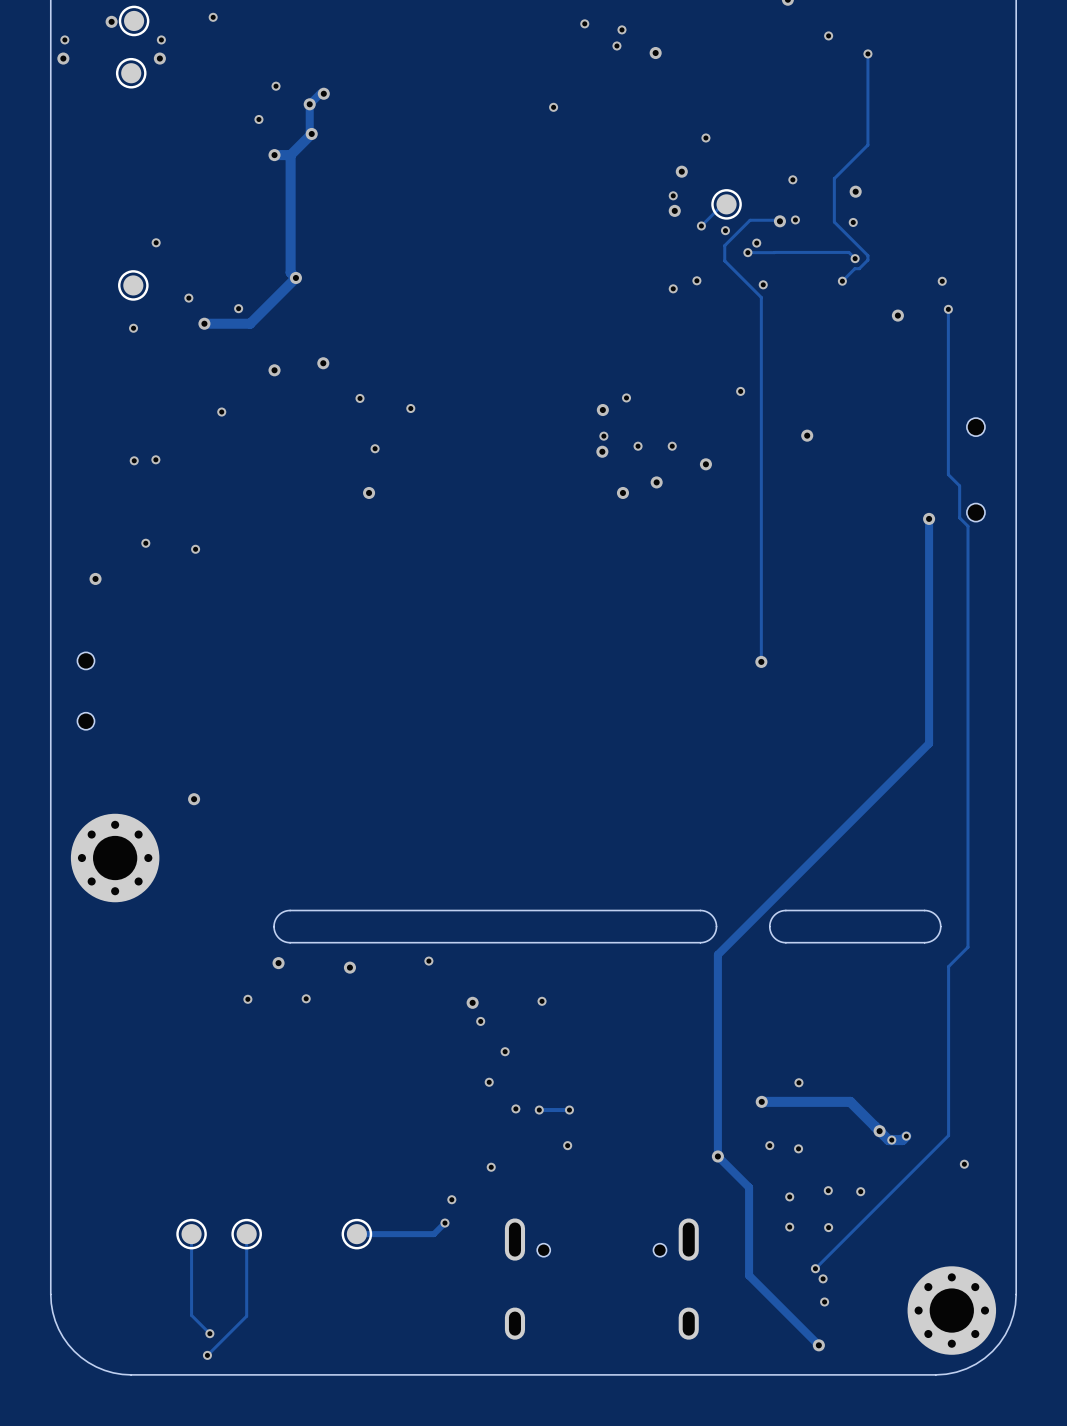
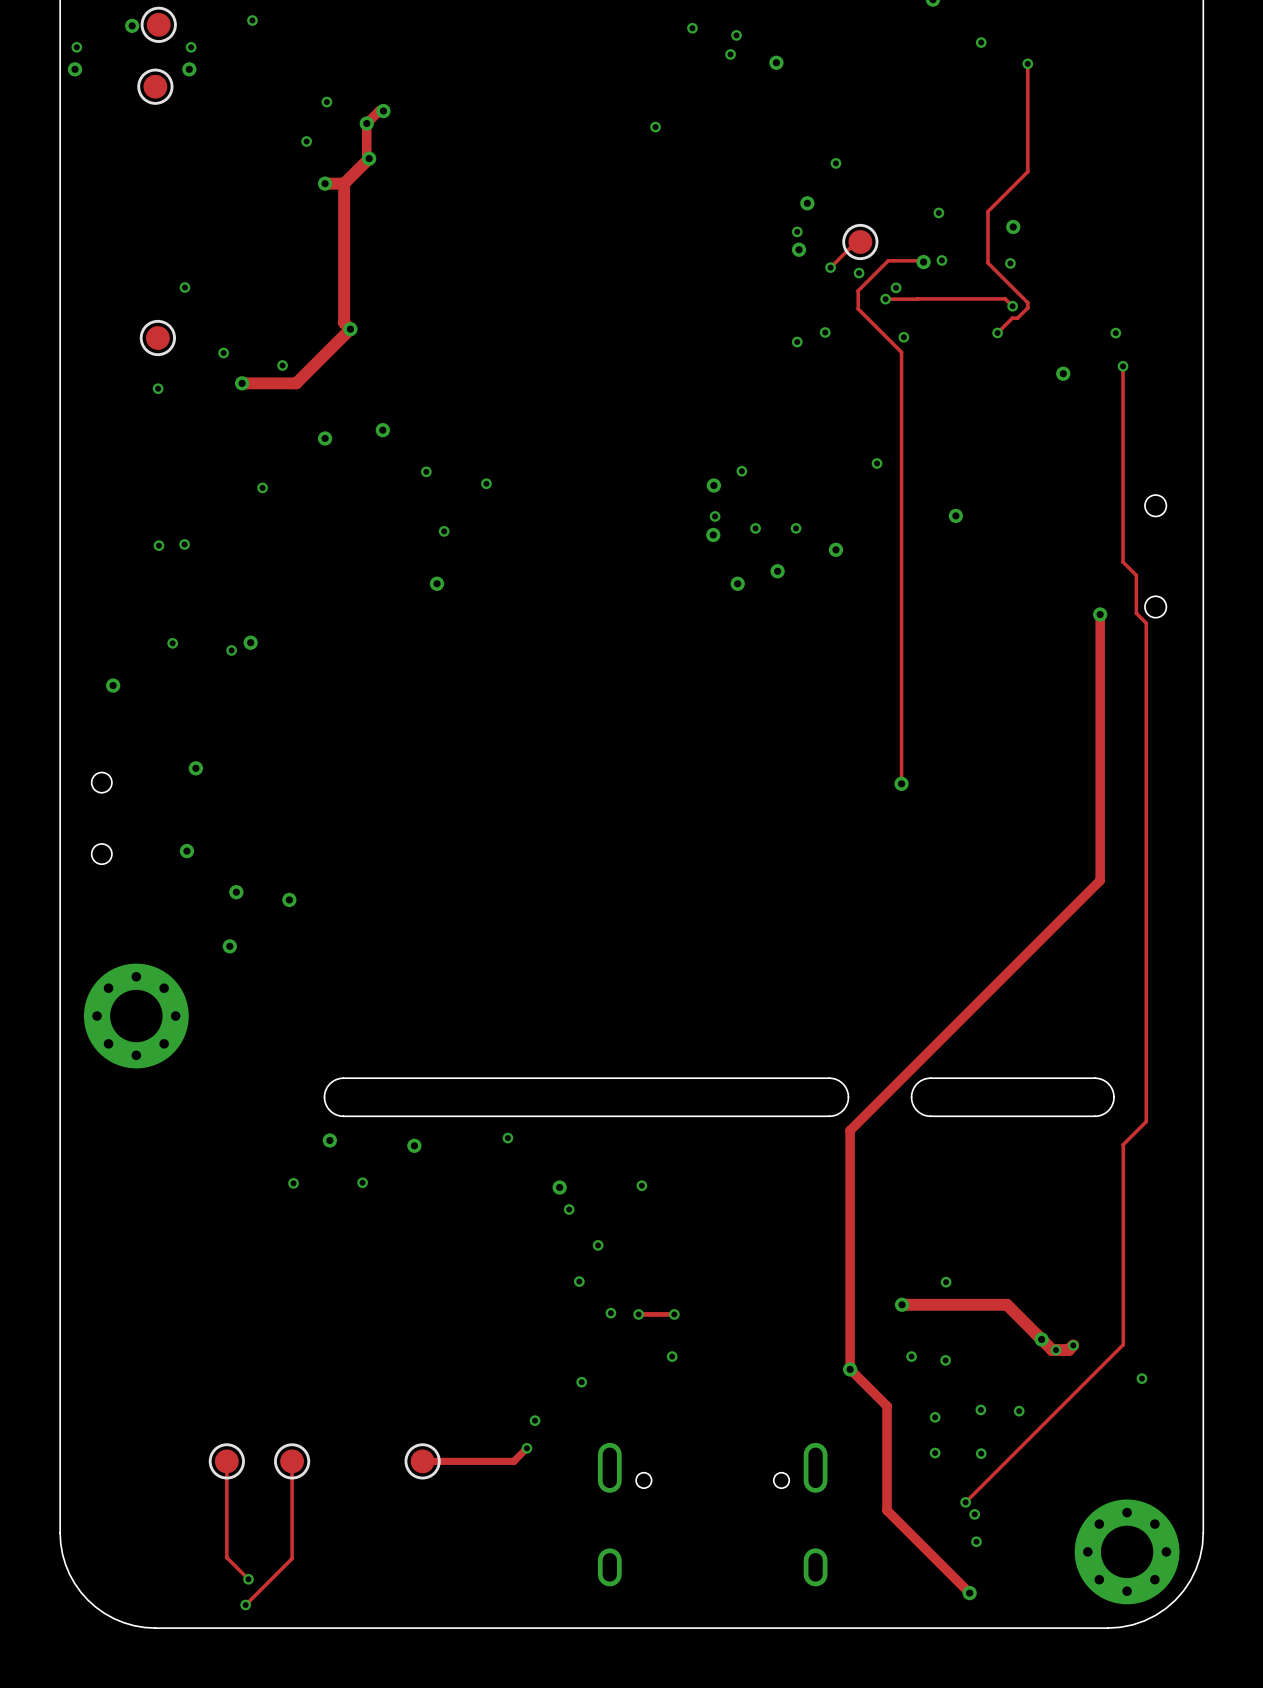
via: none -> (250, 642)
via: none -> (195, 768)
via: none -> (186, 851)
via: none -> (236, 892)
via: none -> (289, 899)

